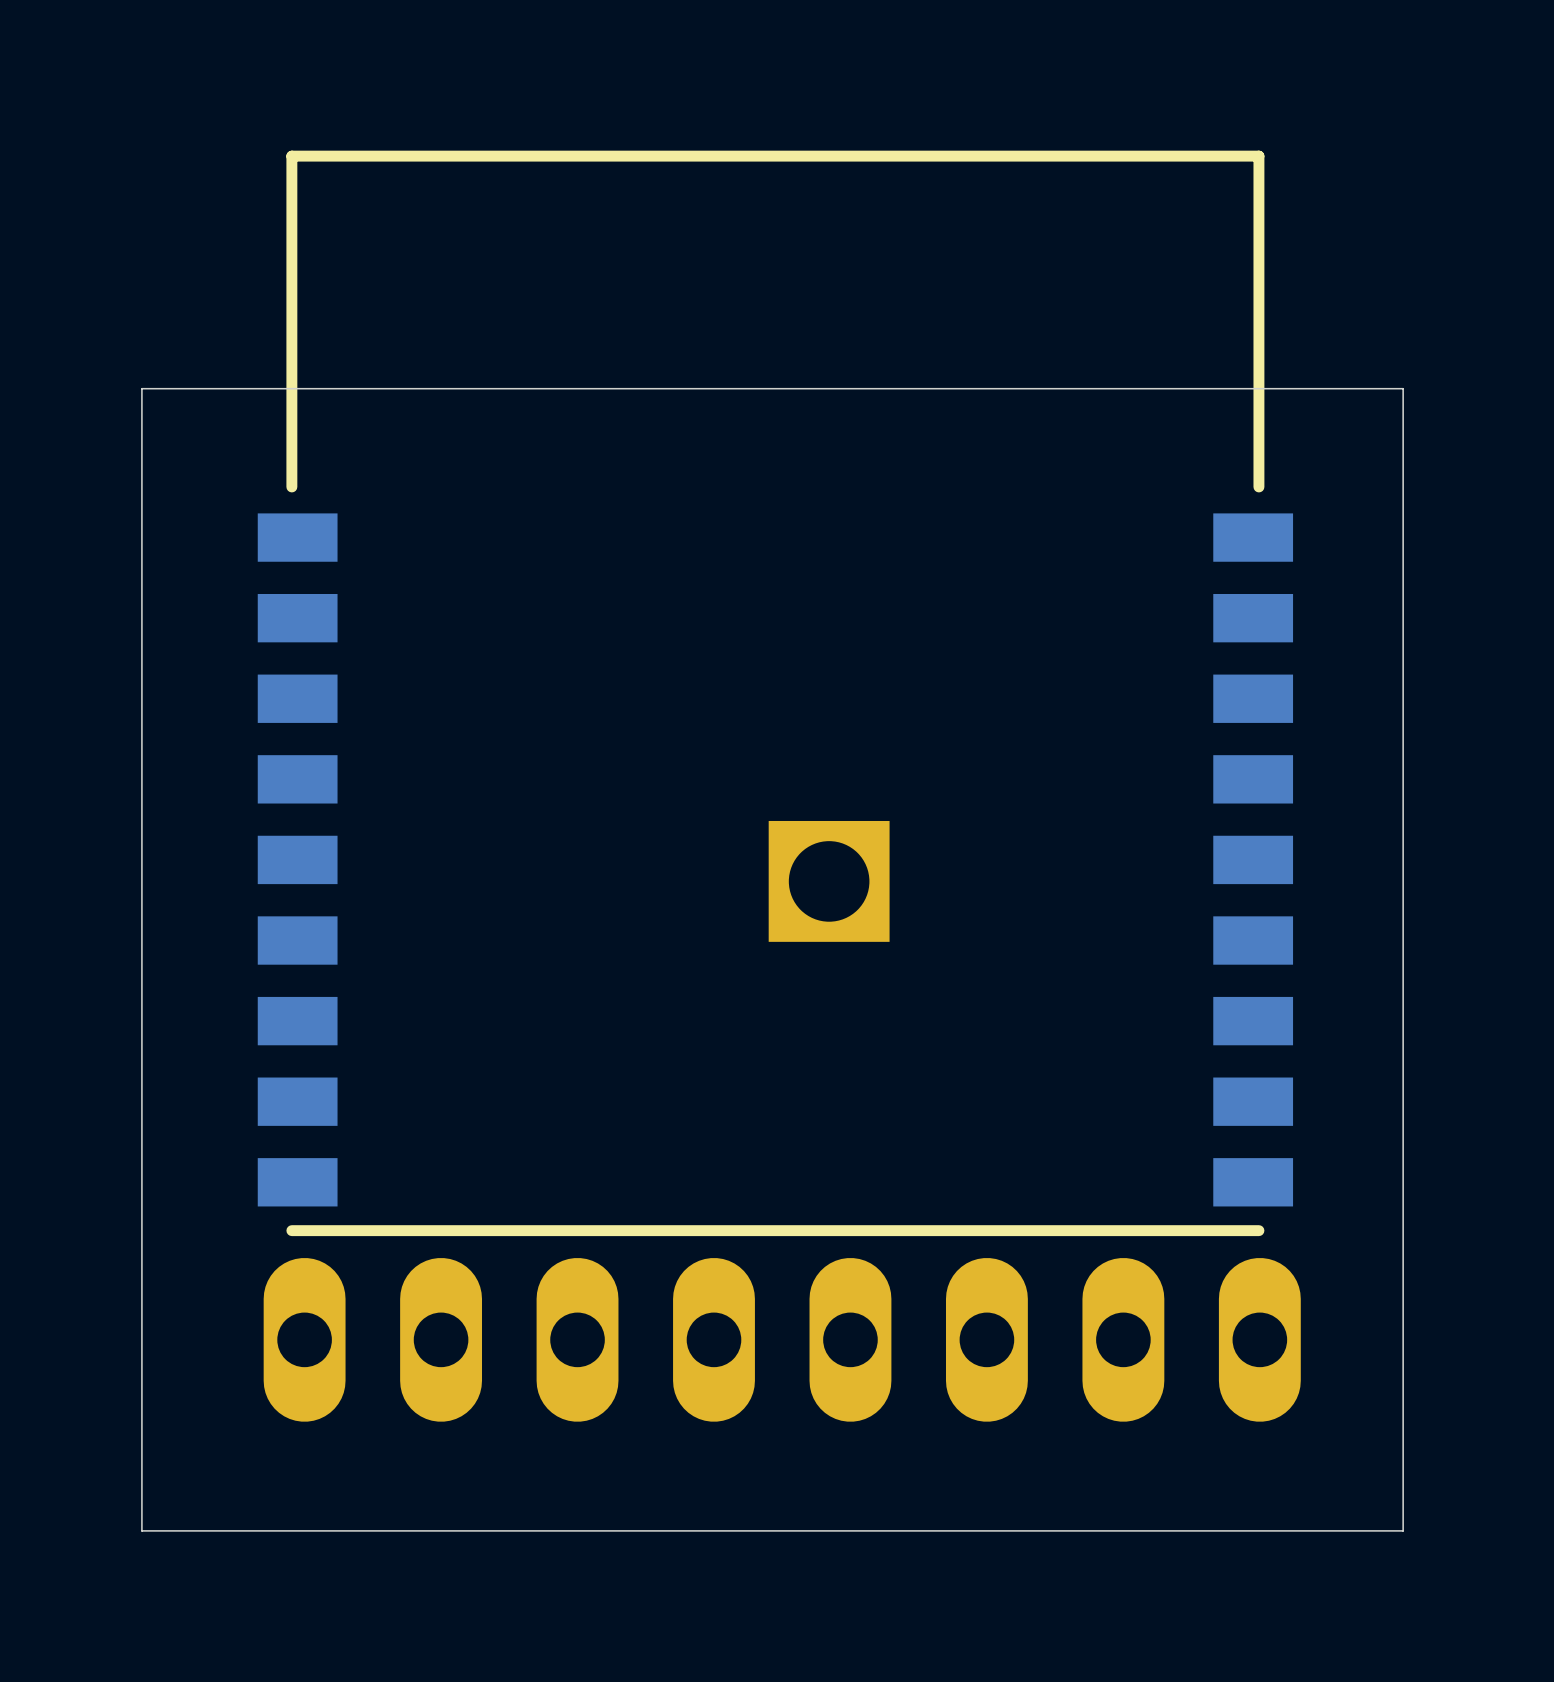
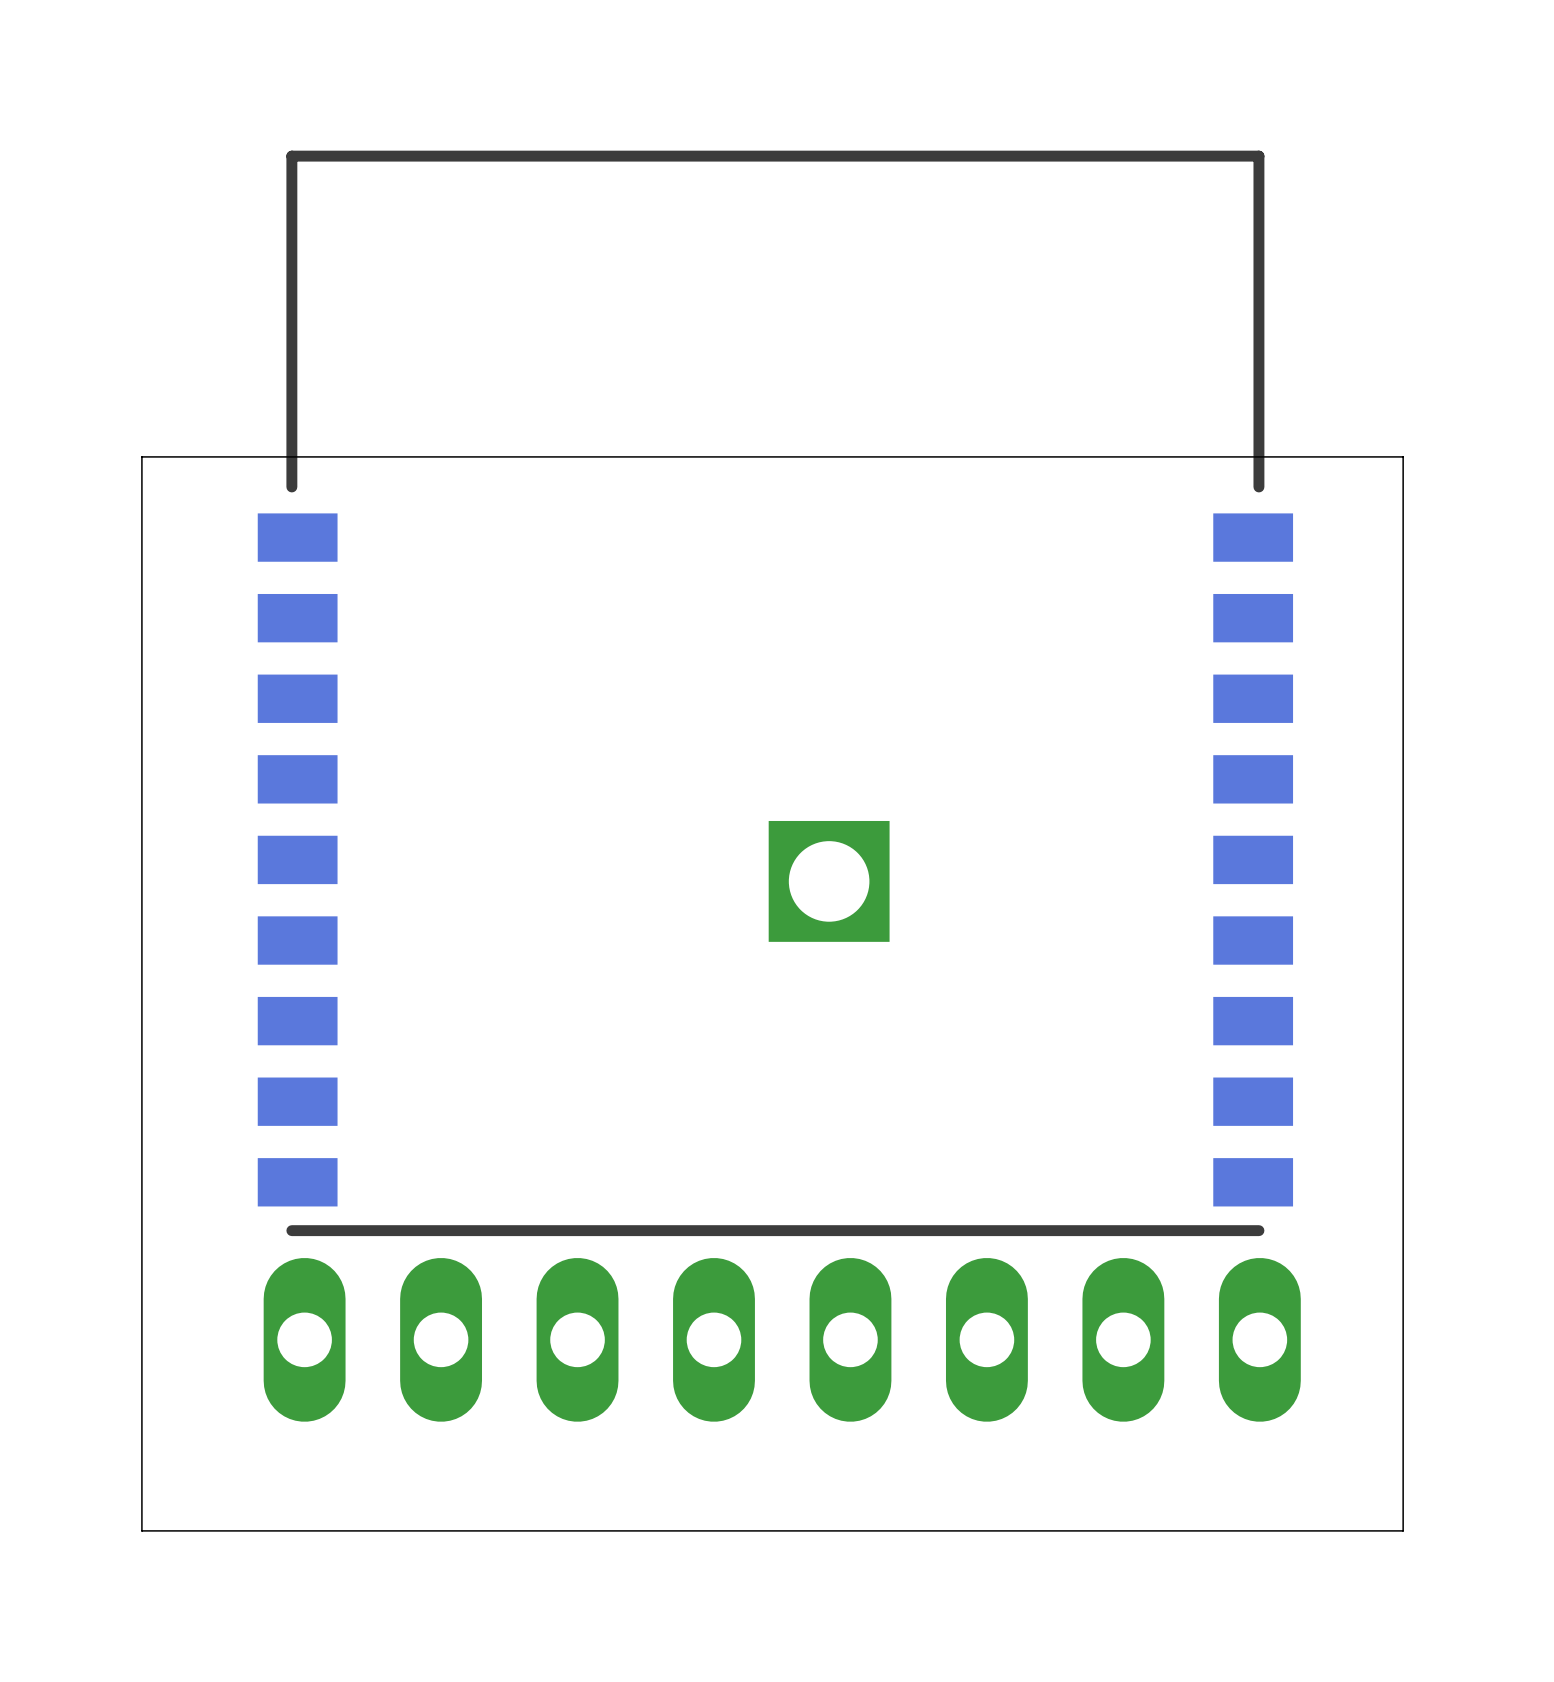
board edge: (1403, 456) (1403, 388) (141, 388) (141, 456) -> (1403, 456) (141, 456)

